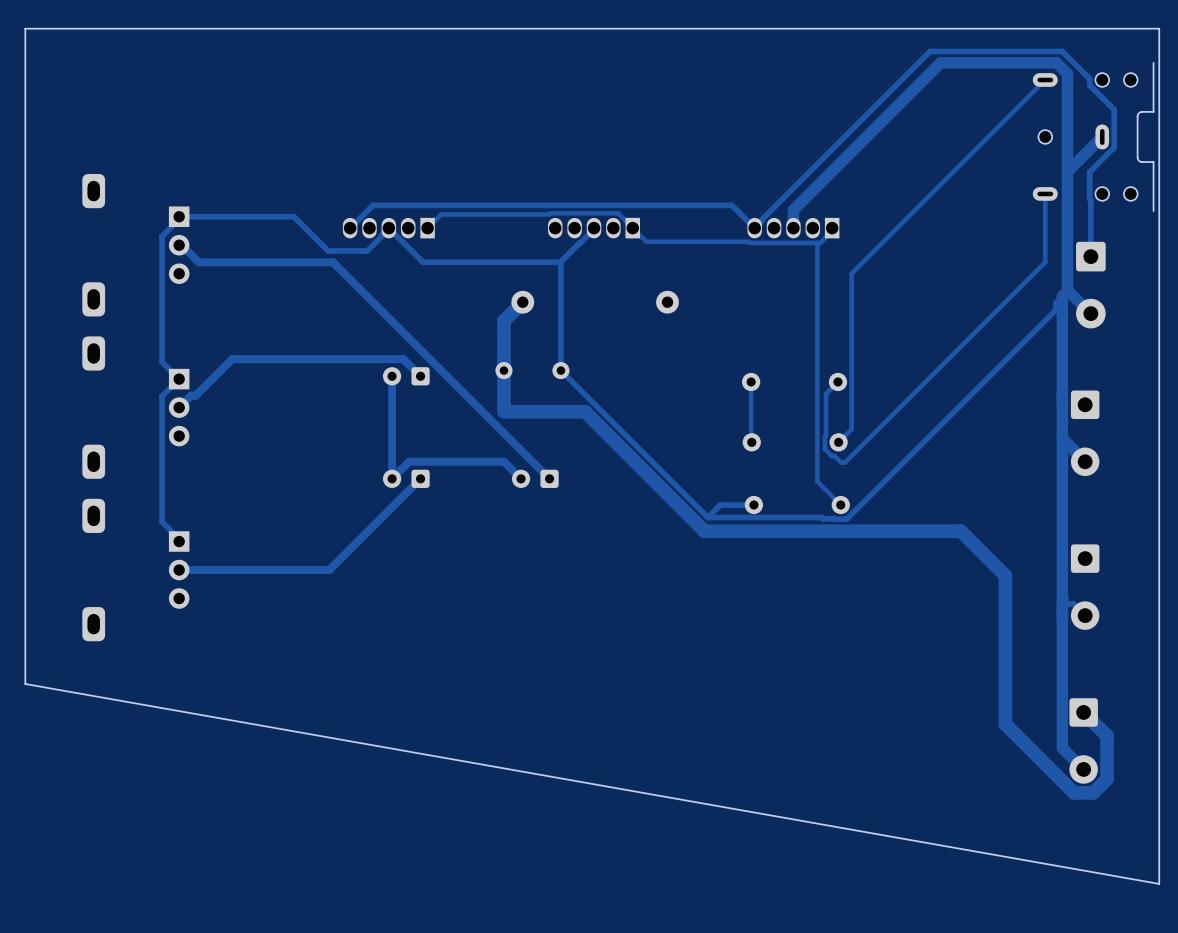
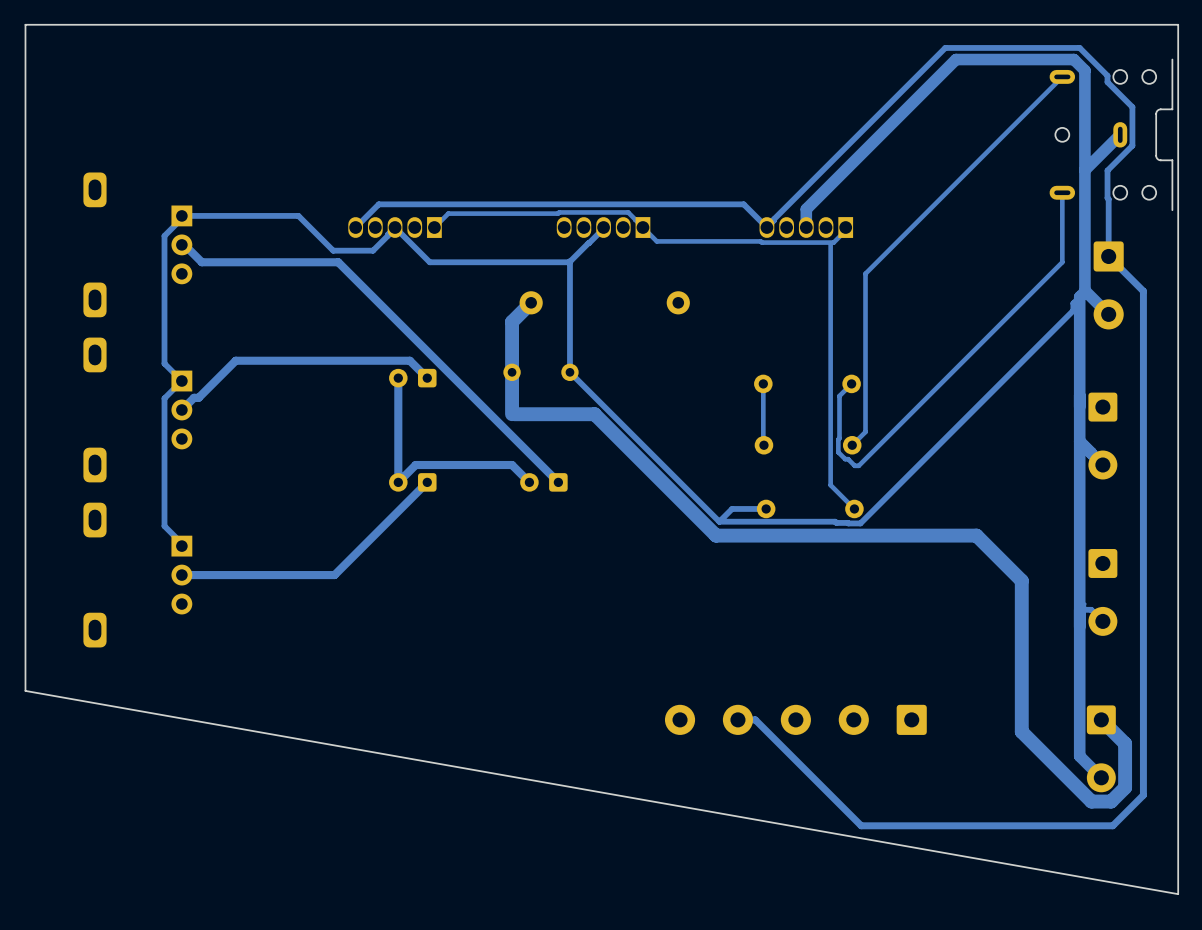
track: none -> (1108, 256) (1143, 291) (1143, 795) (1112, 825) (861, 825) (755, 719) (737, 719)
part: none -> (795, 719)

